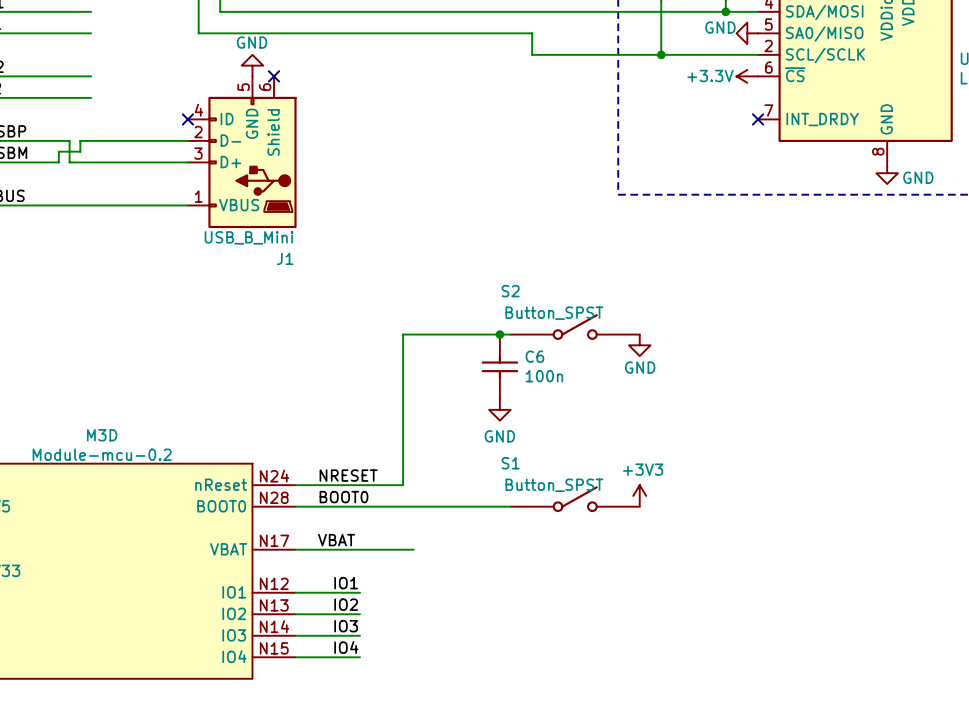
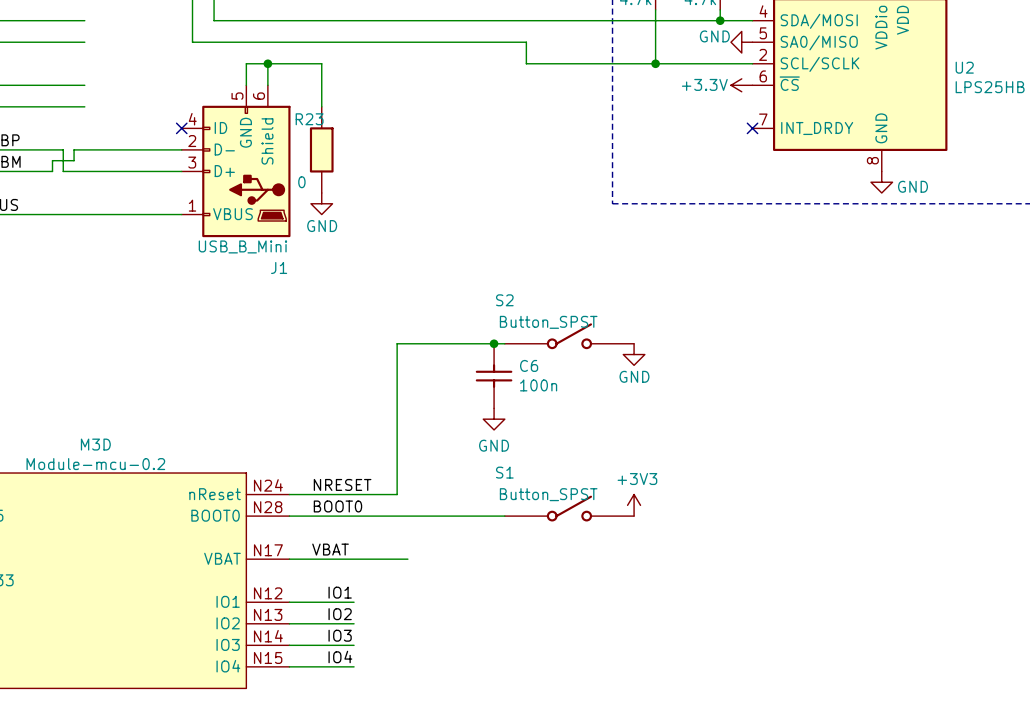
wire: none -> (267, 63) (267, 85)
junction: none -> (267, 63)
power symbol rotation: 0° (252, 65) -> 180° (321, 203)
power symbol position: GND (252, 65) -> GND (321, 203)
wire: none -> (246, 85) (246, 63) (321, 63) (321, 106)
no-connect mark: (273, 76) -> none
R23: none -> 0 (321, 149)

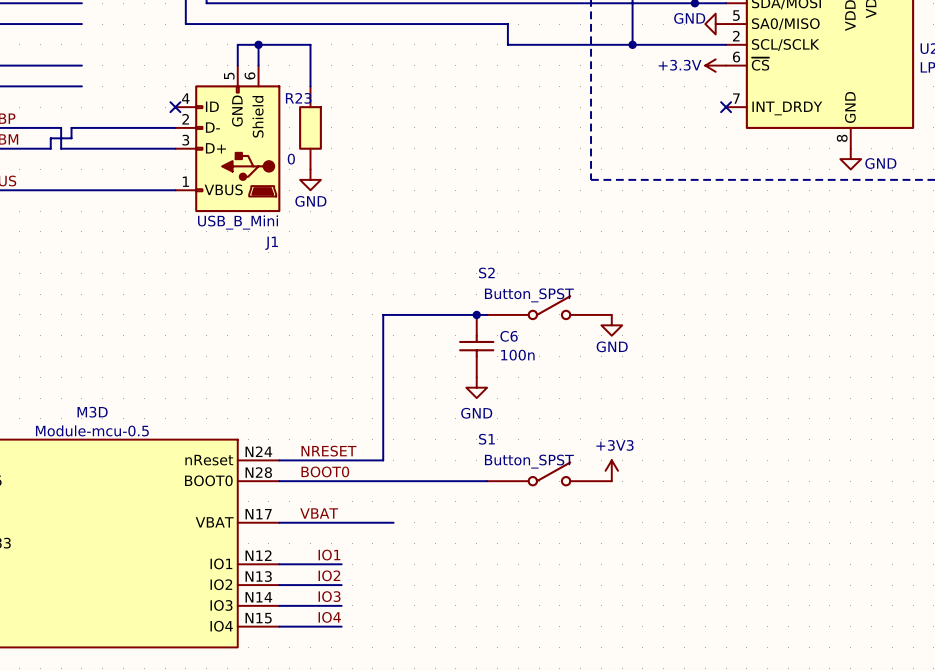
M3D value: Module-mcu-0.2 (95, 464) -> Module-mcu-0.5 (92, 430)

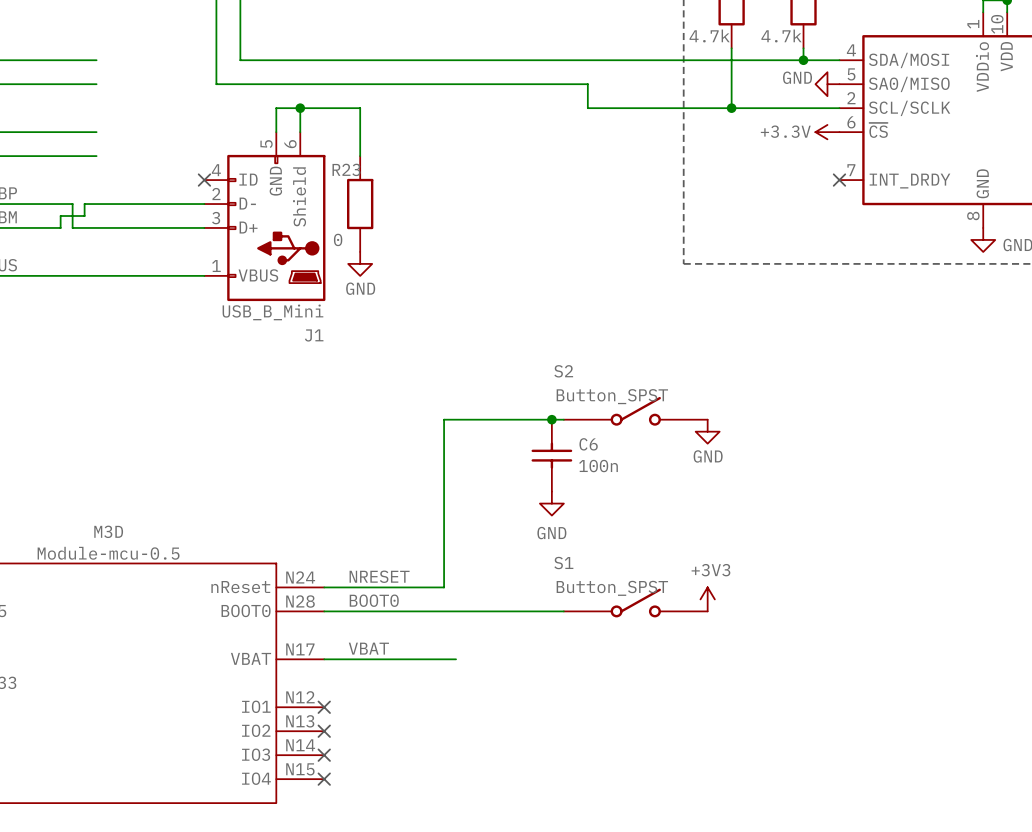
label: IO1 (329, 555) -> none
wire: (279, 564) (341, 564) -> none
no-connect mark: none -> (324, 707)
label: IO2 (329, 575) -> none
wire: (279, 585) (341, 585) -> none
no-connect mark: none -> (324, 731)
label: IO3 (329, 596) -> none
wire: (279, 605) (341, 605) -> none
no-connect mark: none -> (324, 755)
label: IO4 (329, 617) -> none
wire: (279, 626) (341, 626) -> none
no-connect mark: none -> (324, 779)

